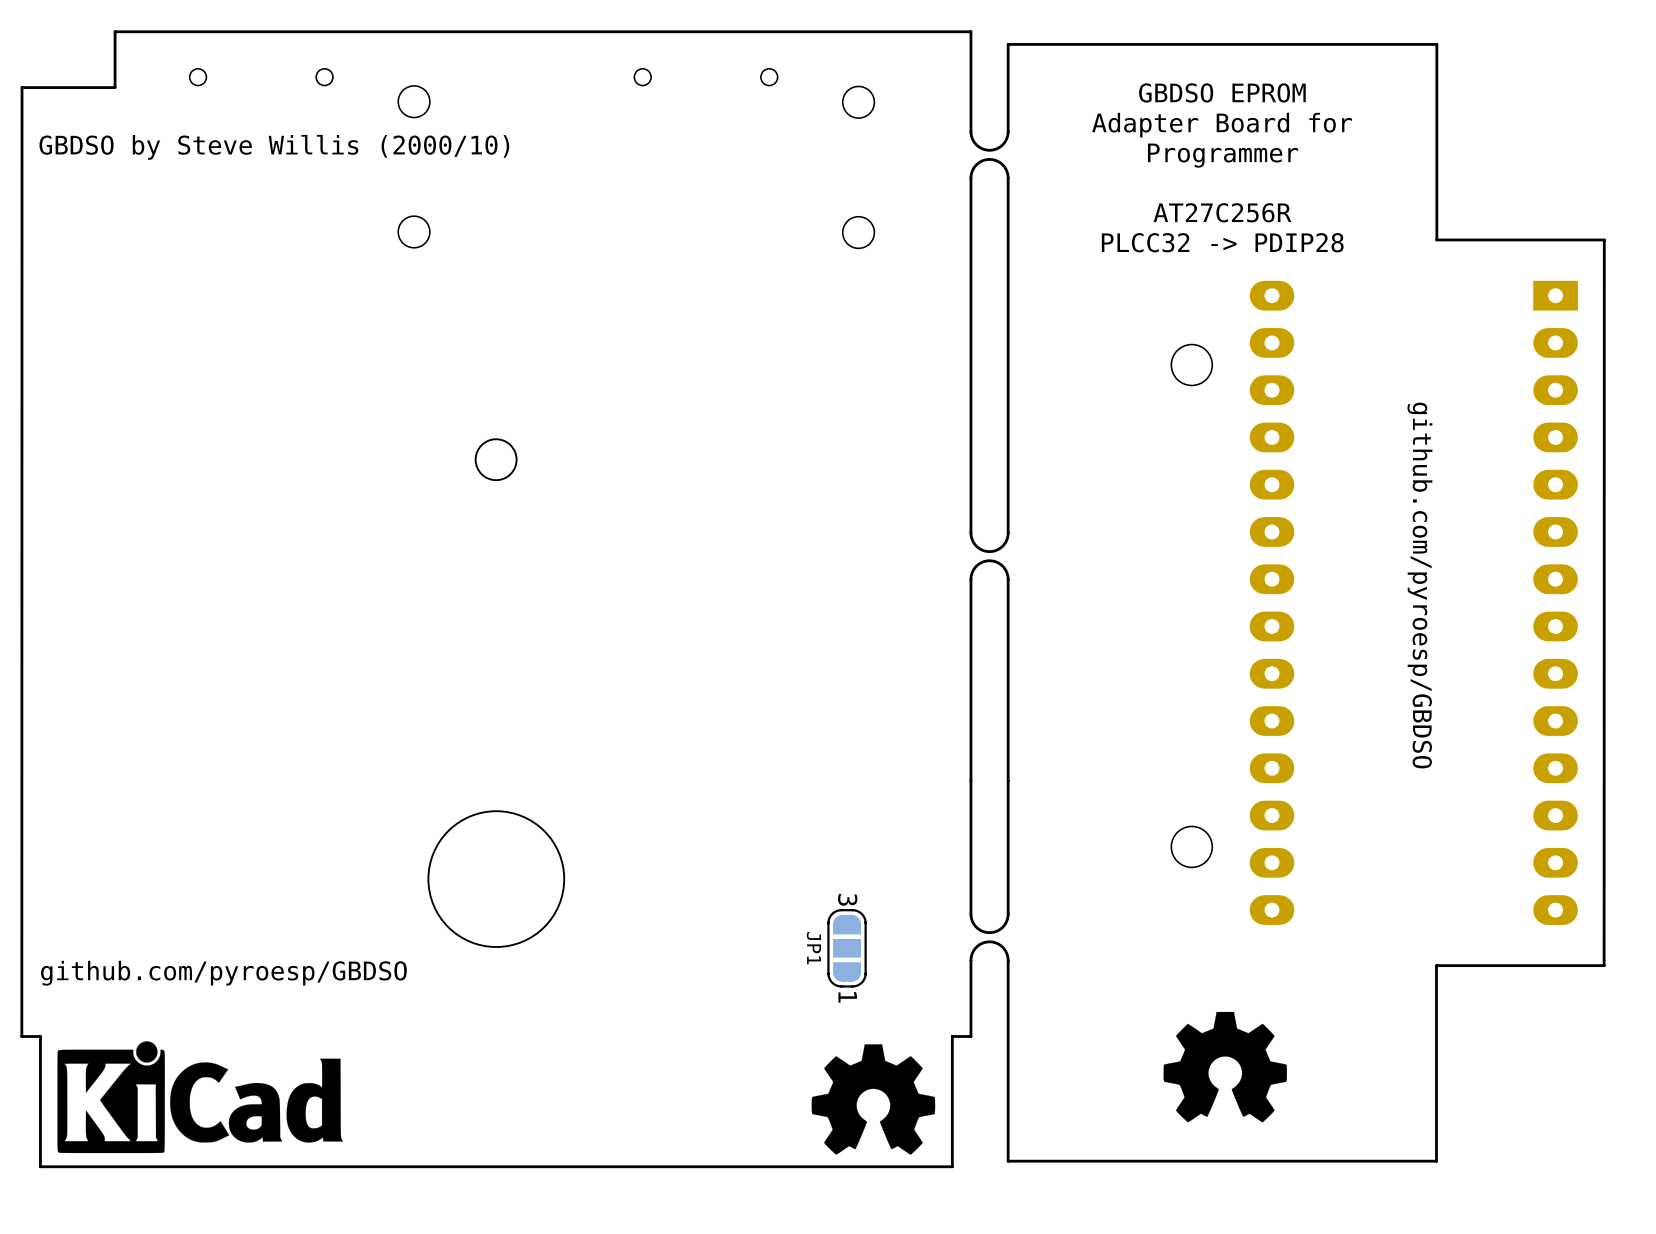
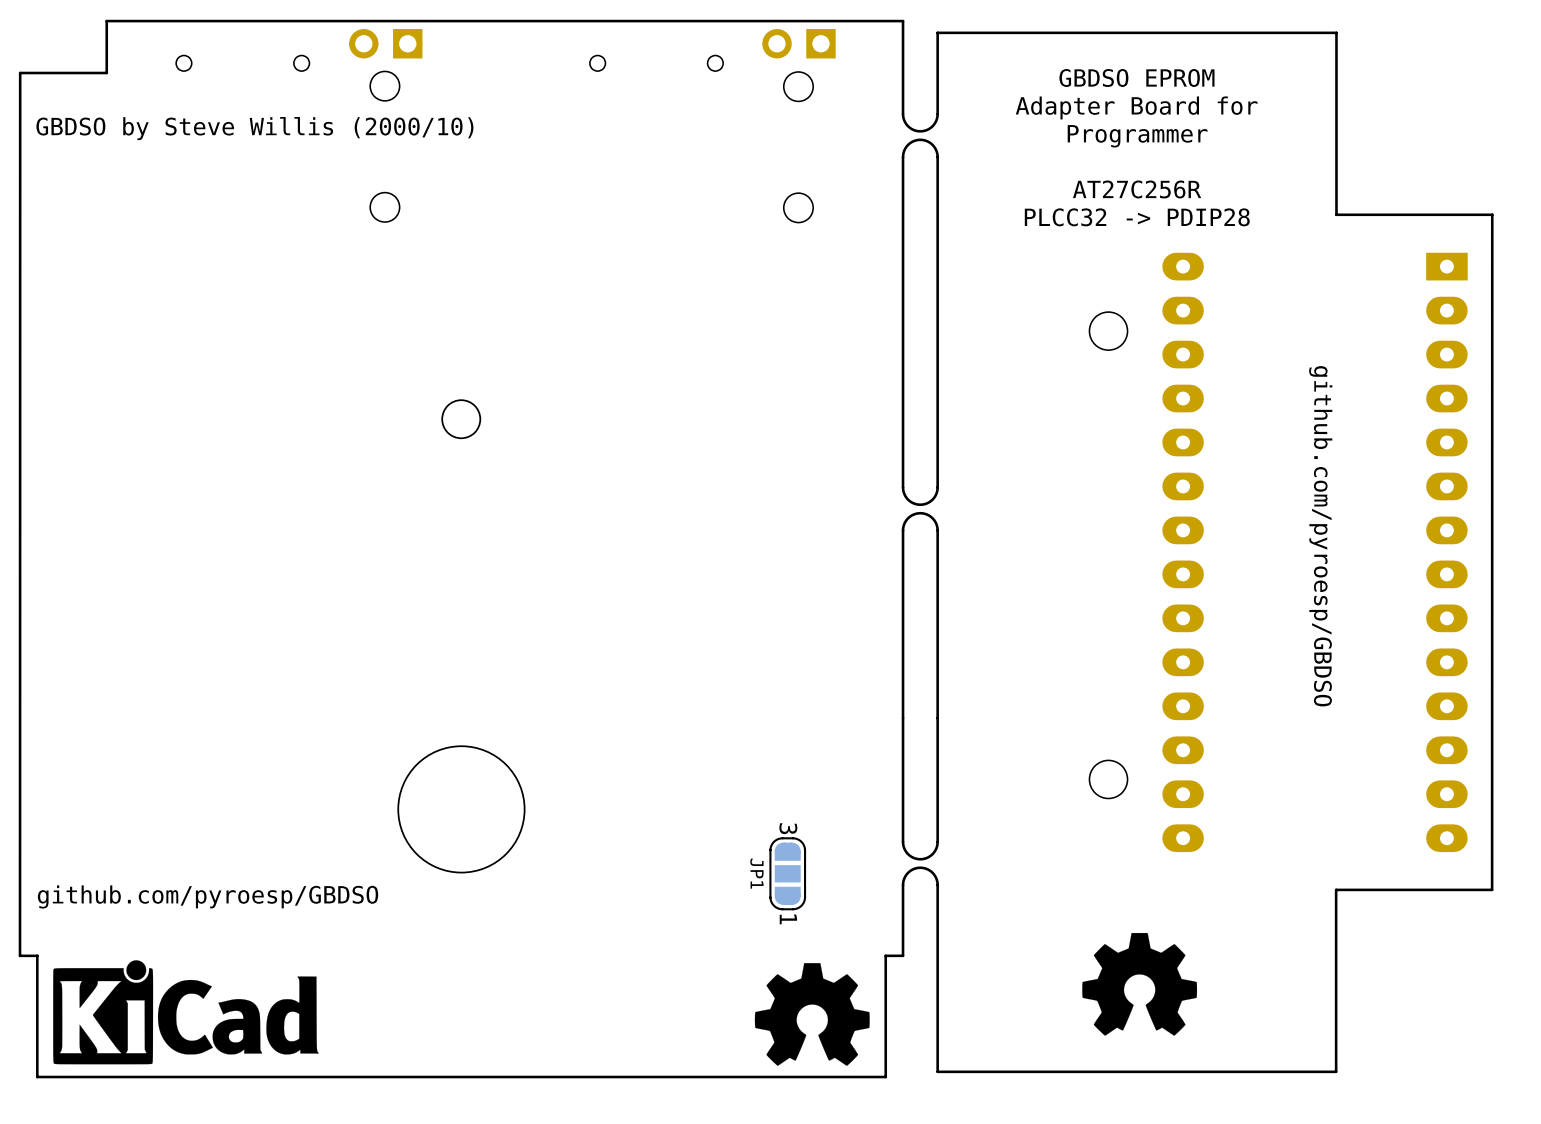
part: none -> (385, 43)
part: none -> (798, 43)

